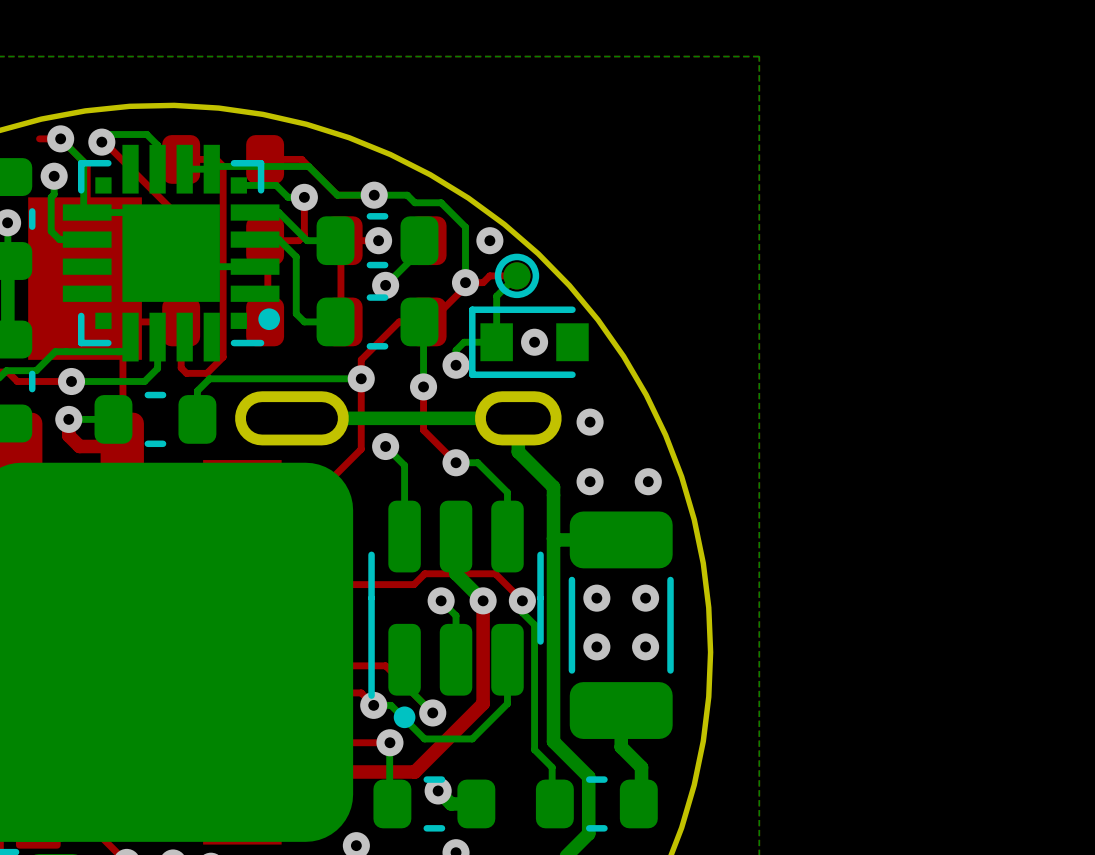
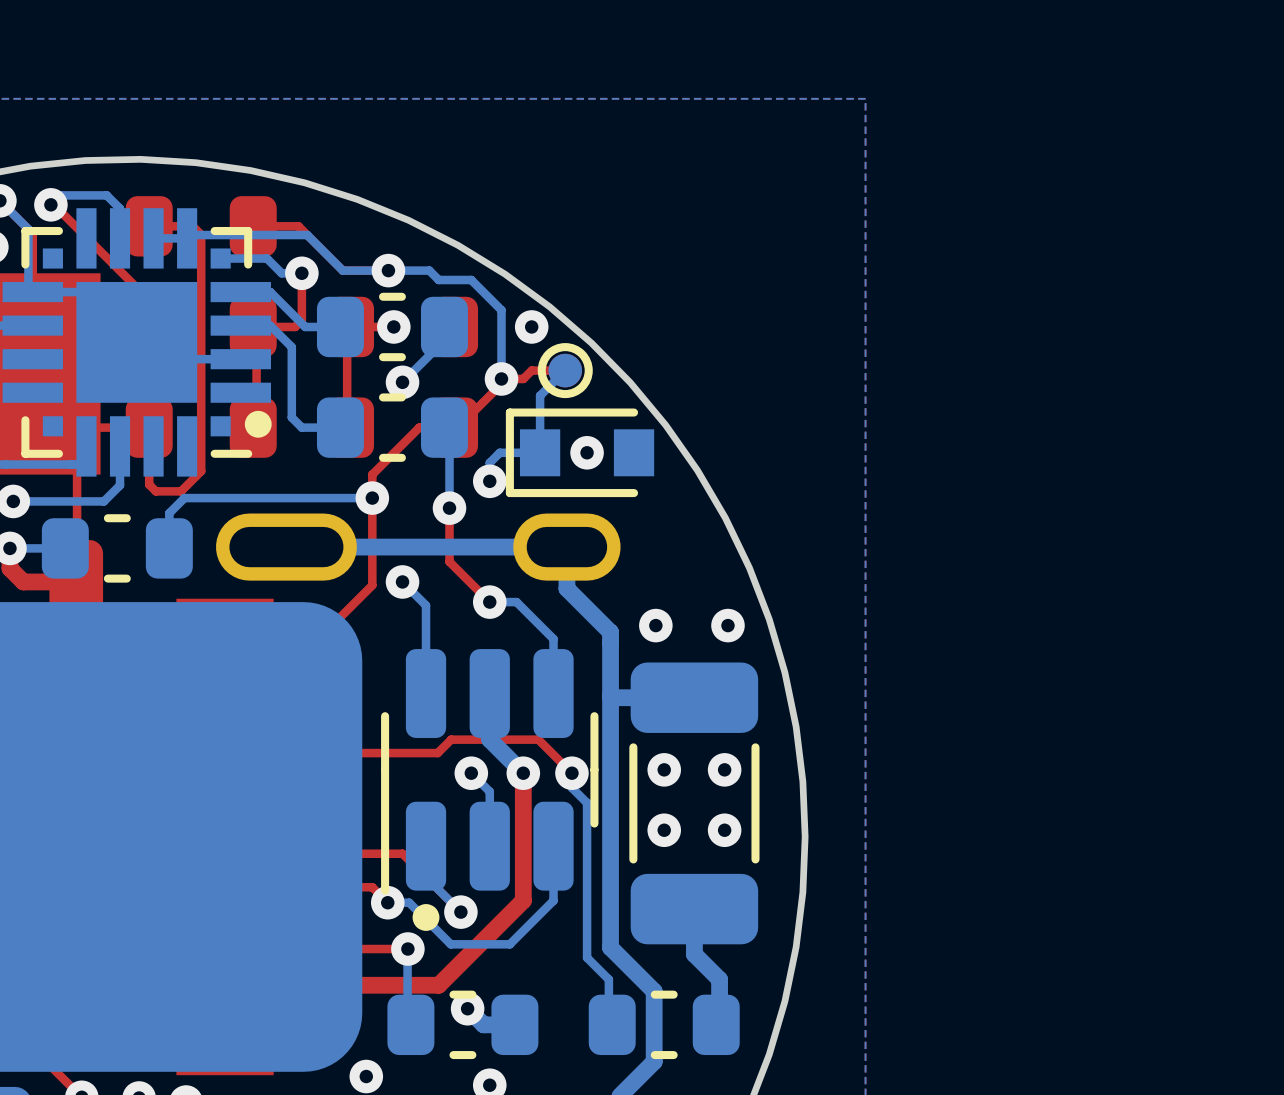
via: (590, 422) -> none

